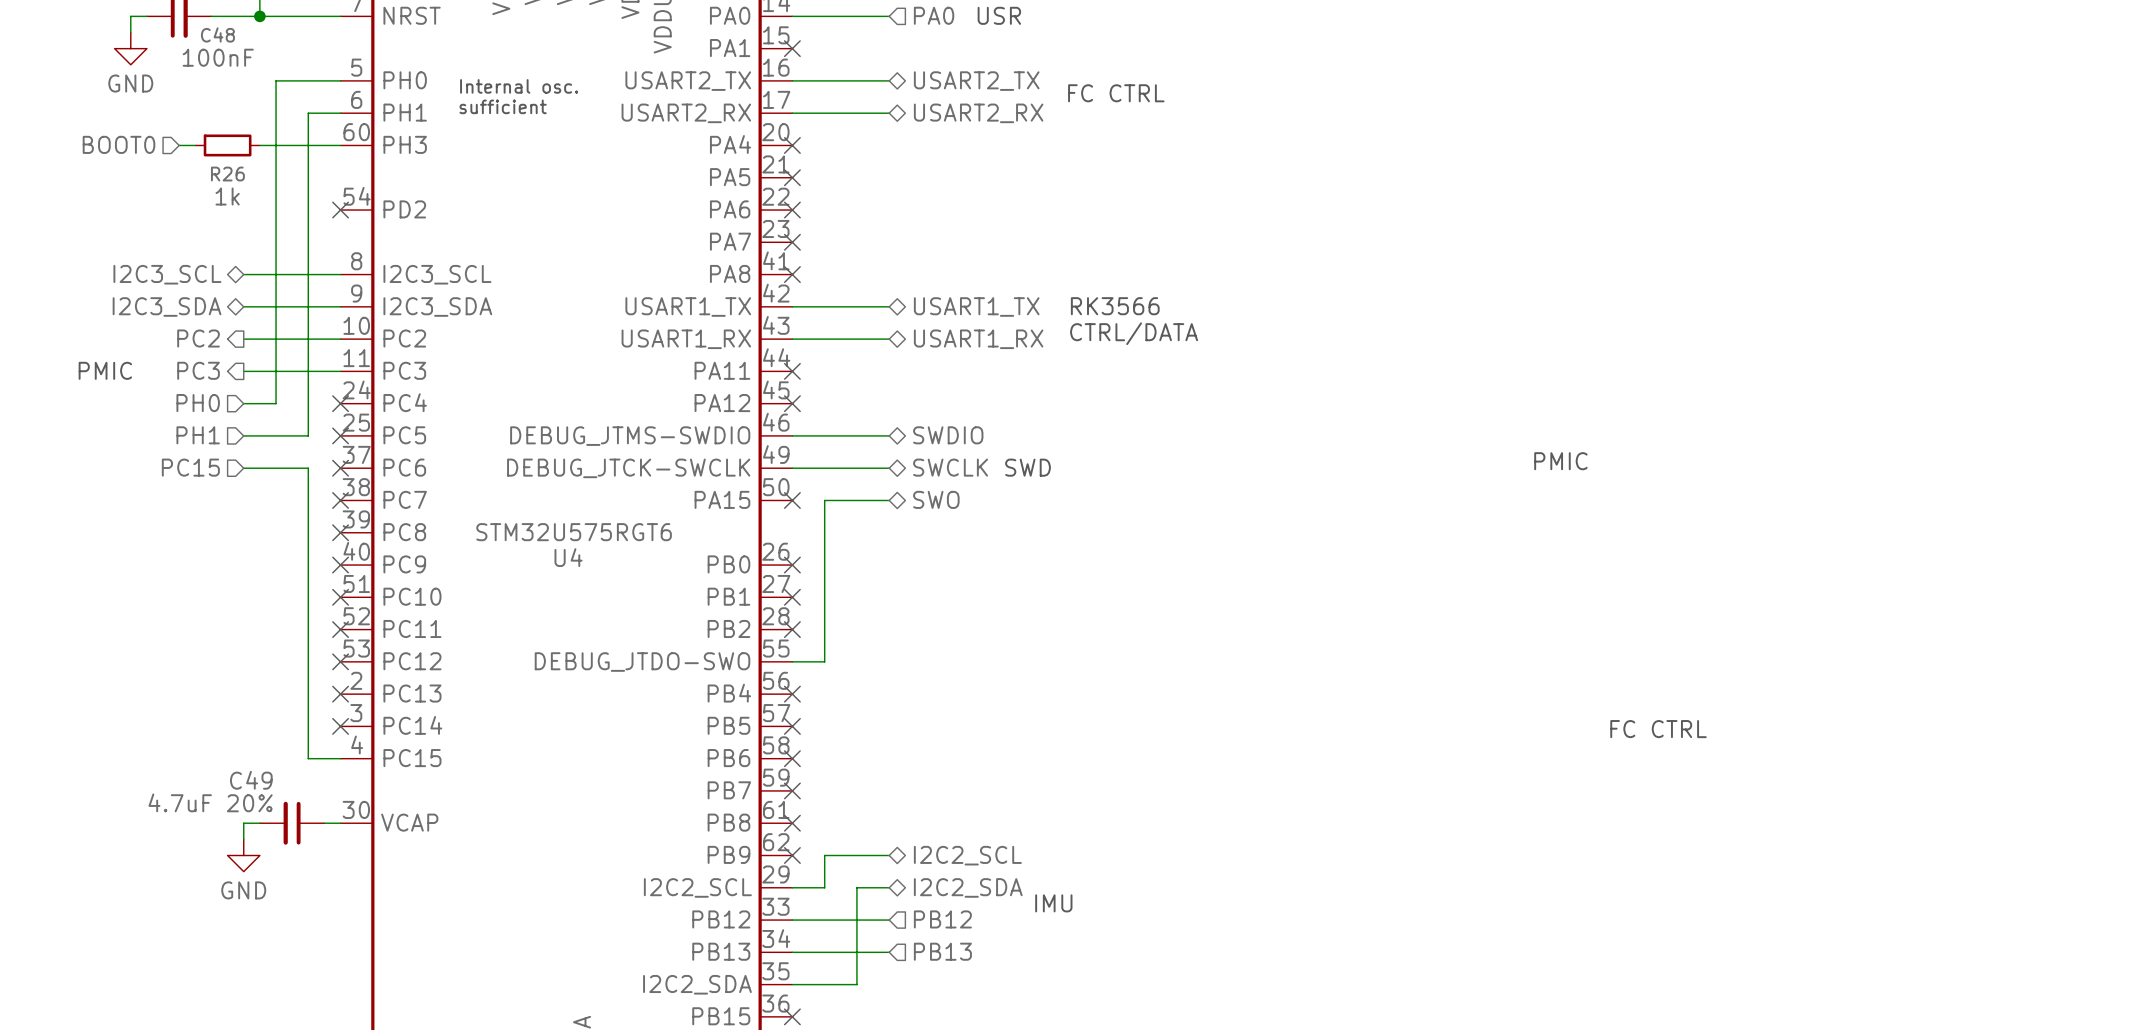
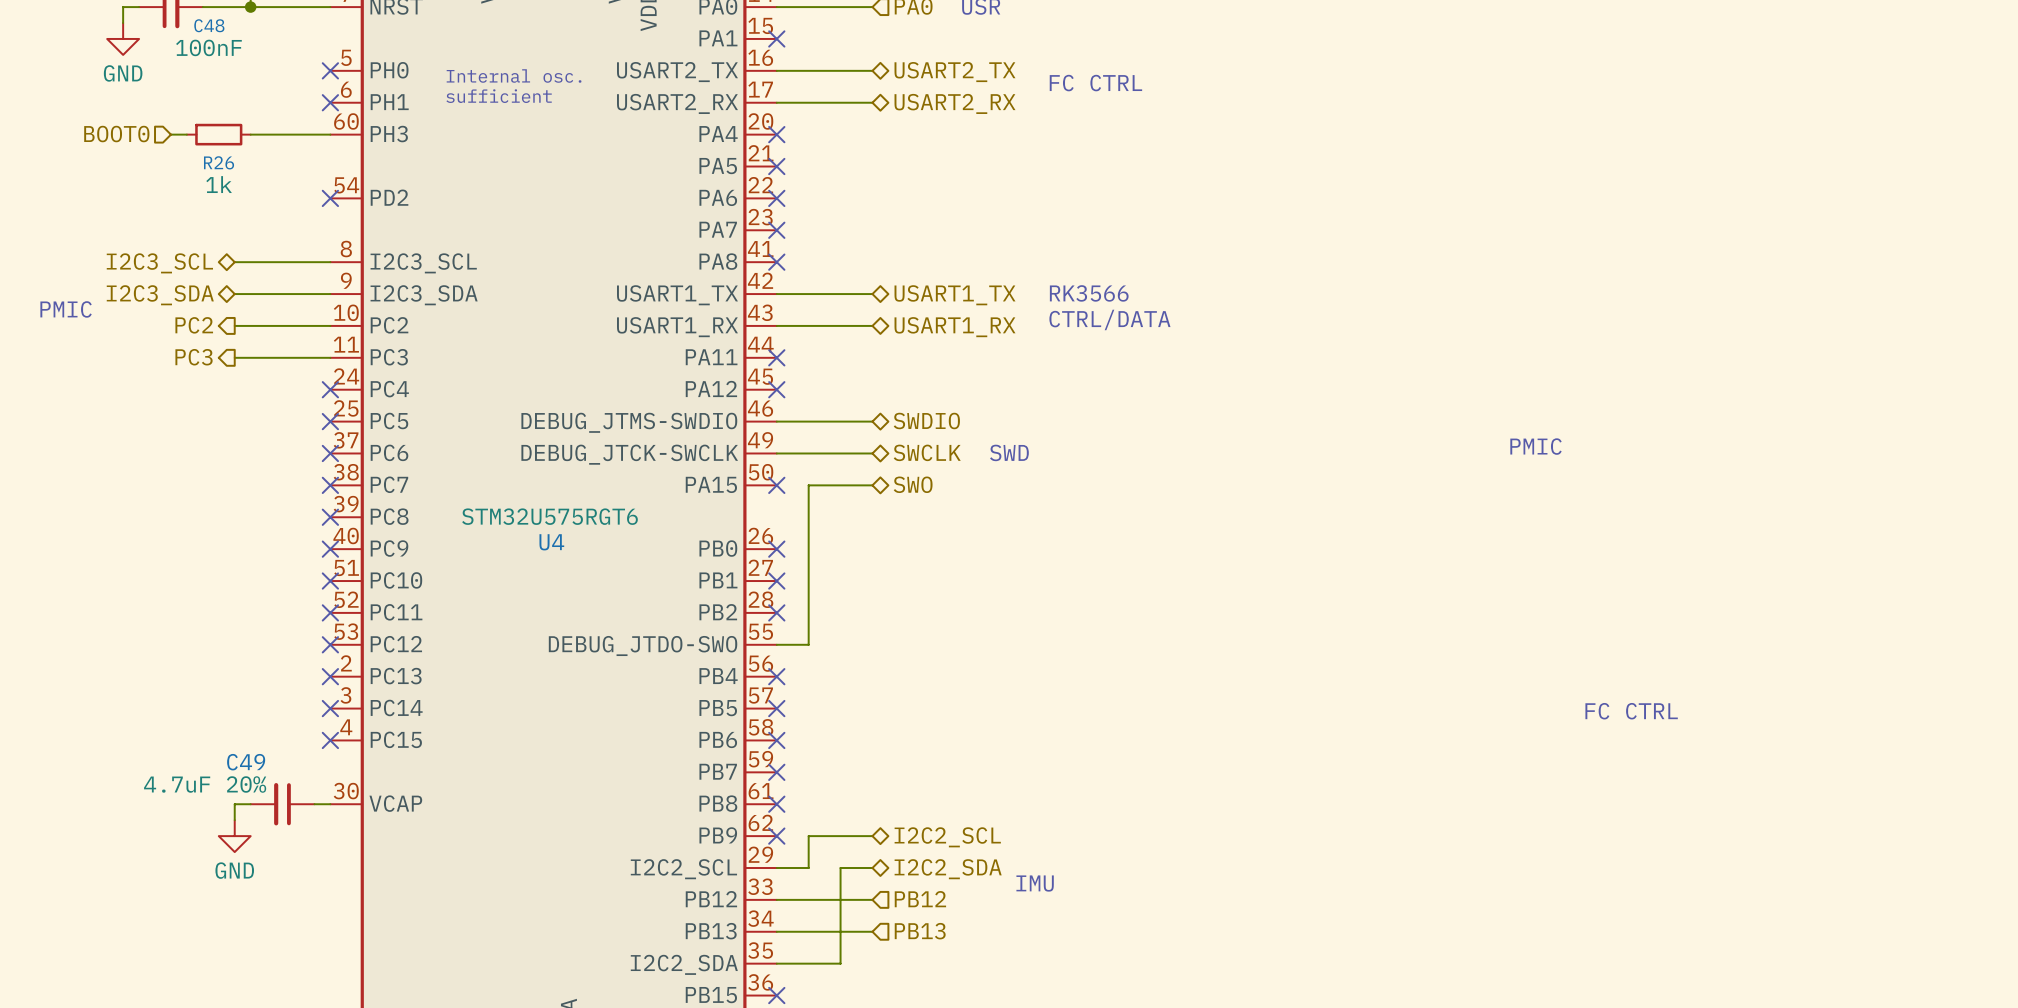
wire: (340, 80) (276, 80) (276, 403) (243, 403) -> none
no-connect mark: none -> (330, 70)
wire: (340, 113) (308, 113) (308, 435) (243, 435) -> none
no-connect mark: none -> (330, 102)
text position: PMIC (105, 370) -> PMIC (66, 309)
hierarchical label: PH0 (198, 403) -> none
hierarchical label: PH1 (198, 435) -> none
hierarchical label: PC15 (190, 467) -> none
wire: (243, 468) (308, 468) (308, 758) (340, 758) -> none
no-connect mark: none -> (330, 740)

